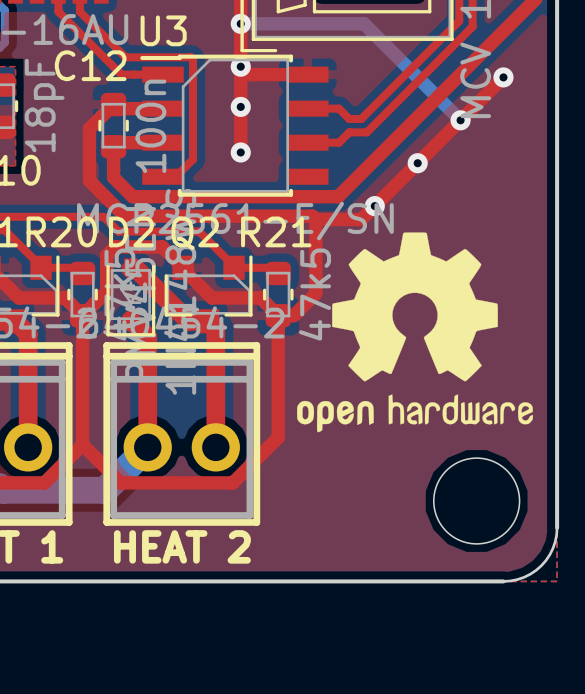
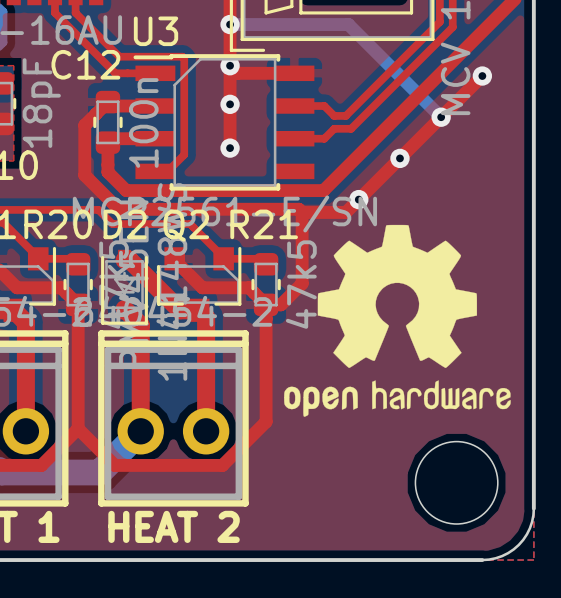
top track: (183, 267) (162, 246) (115, 246) (106, 255) (106, 291) (82, 315) -> none

